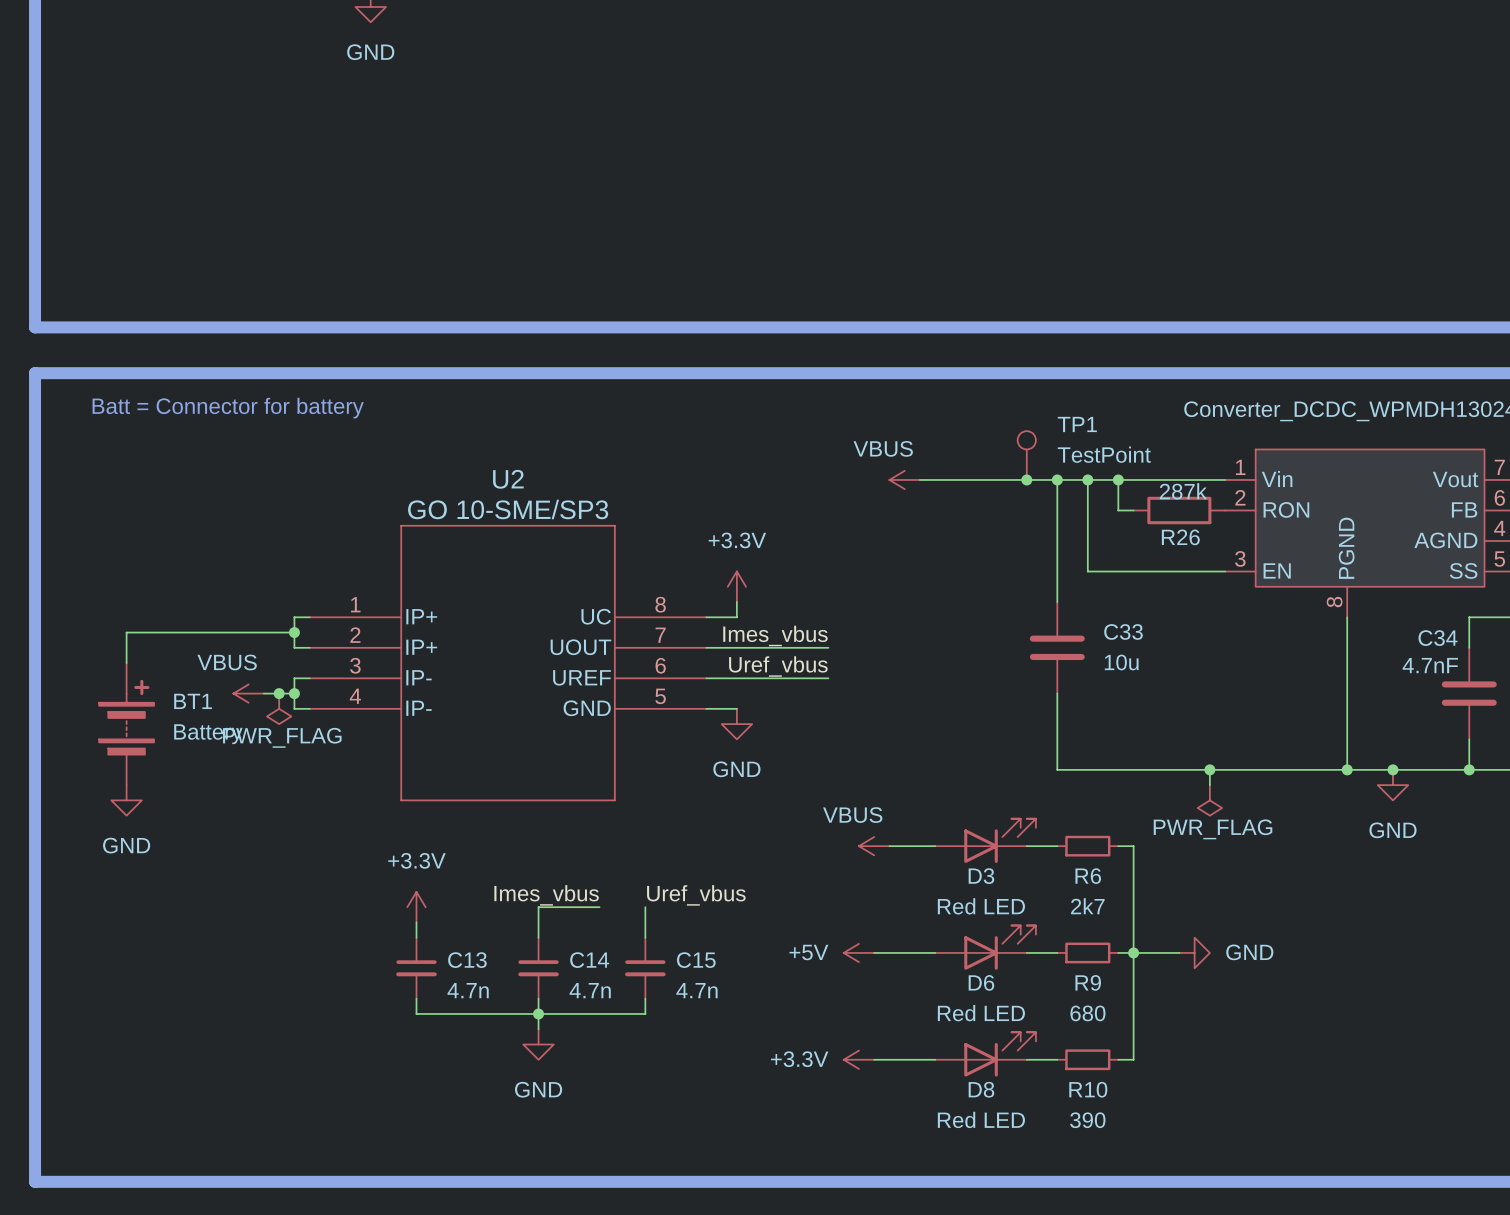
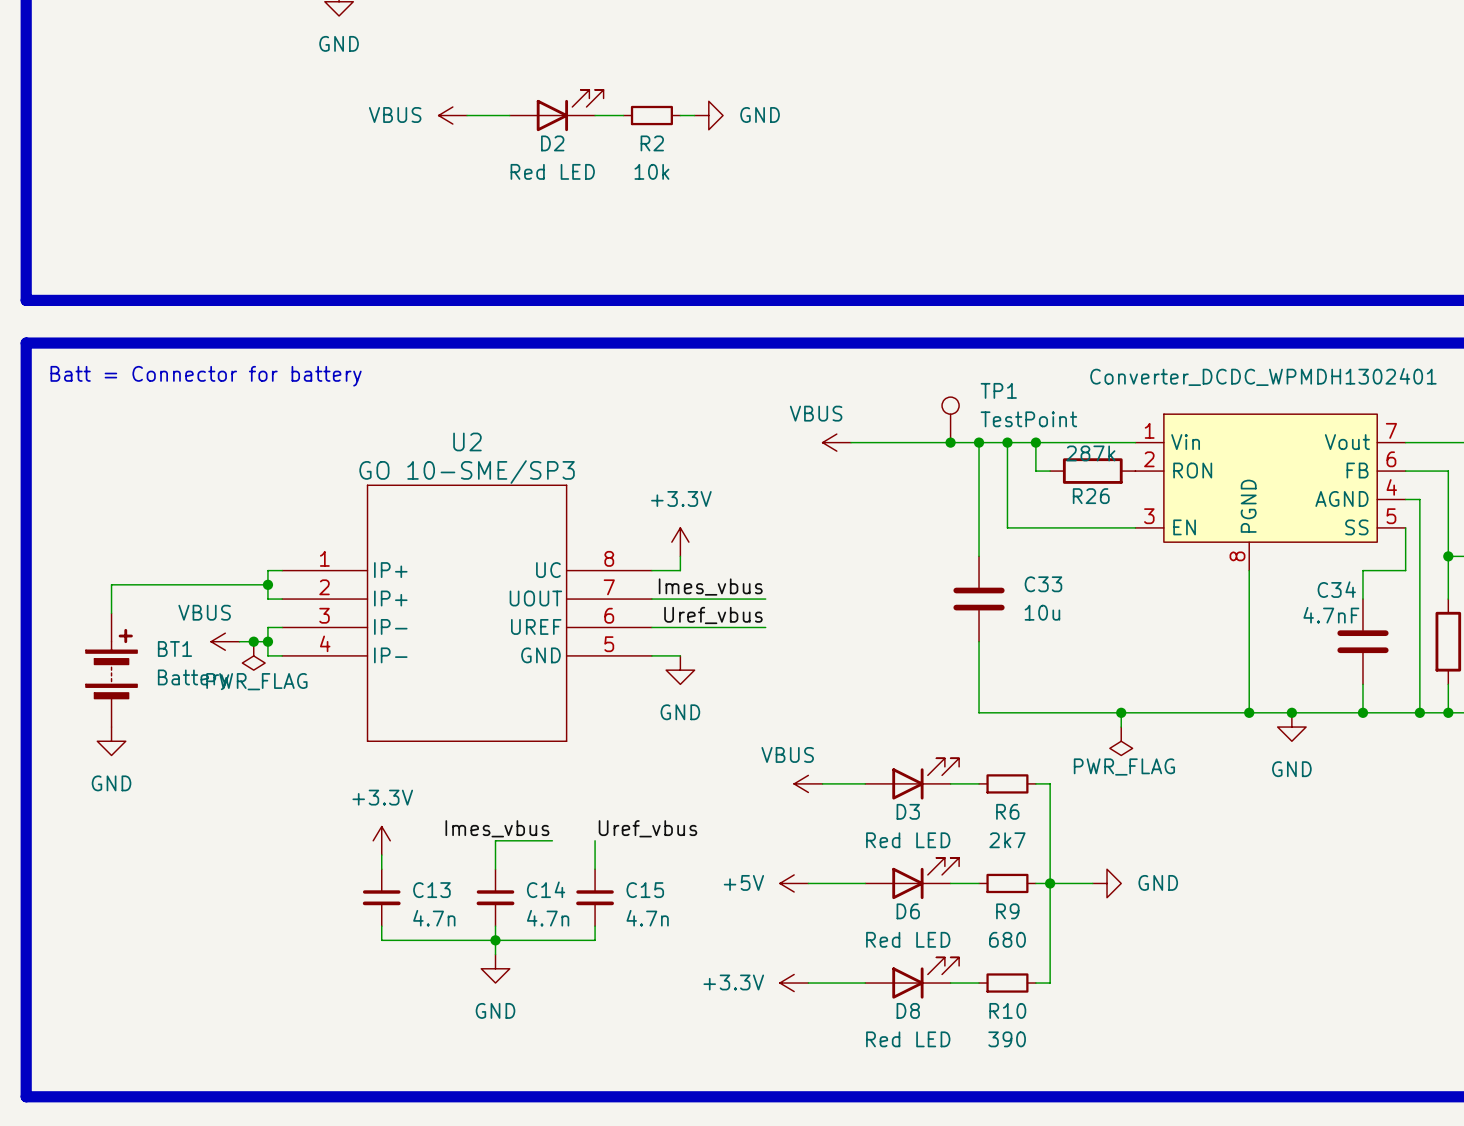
D2: none -> Red LED (556, 110)
power symbol: none -> VBUS (452, 115)
wire: none -> (467, 115) (509, 115)
wire: none -> (595, 115) (623, 115)
R2: none -> 10k (651, 115)
wire: none -> (680, 115) (694, 115)
power symbol: none -> GND (708, 115)

